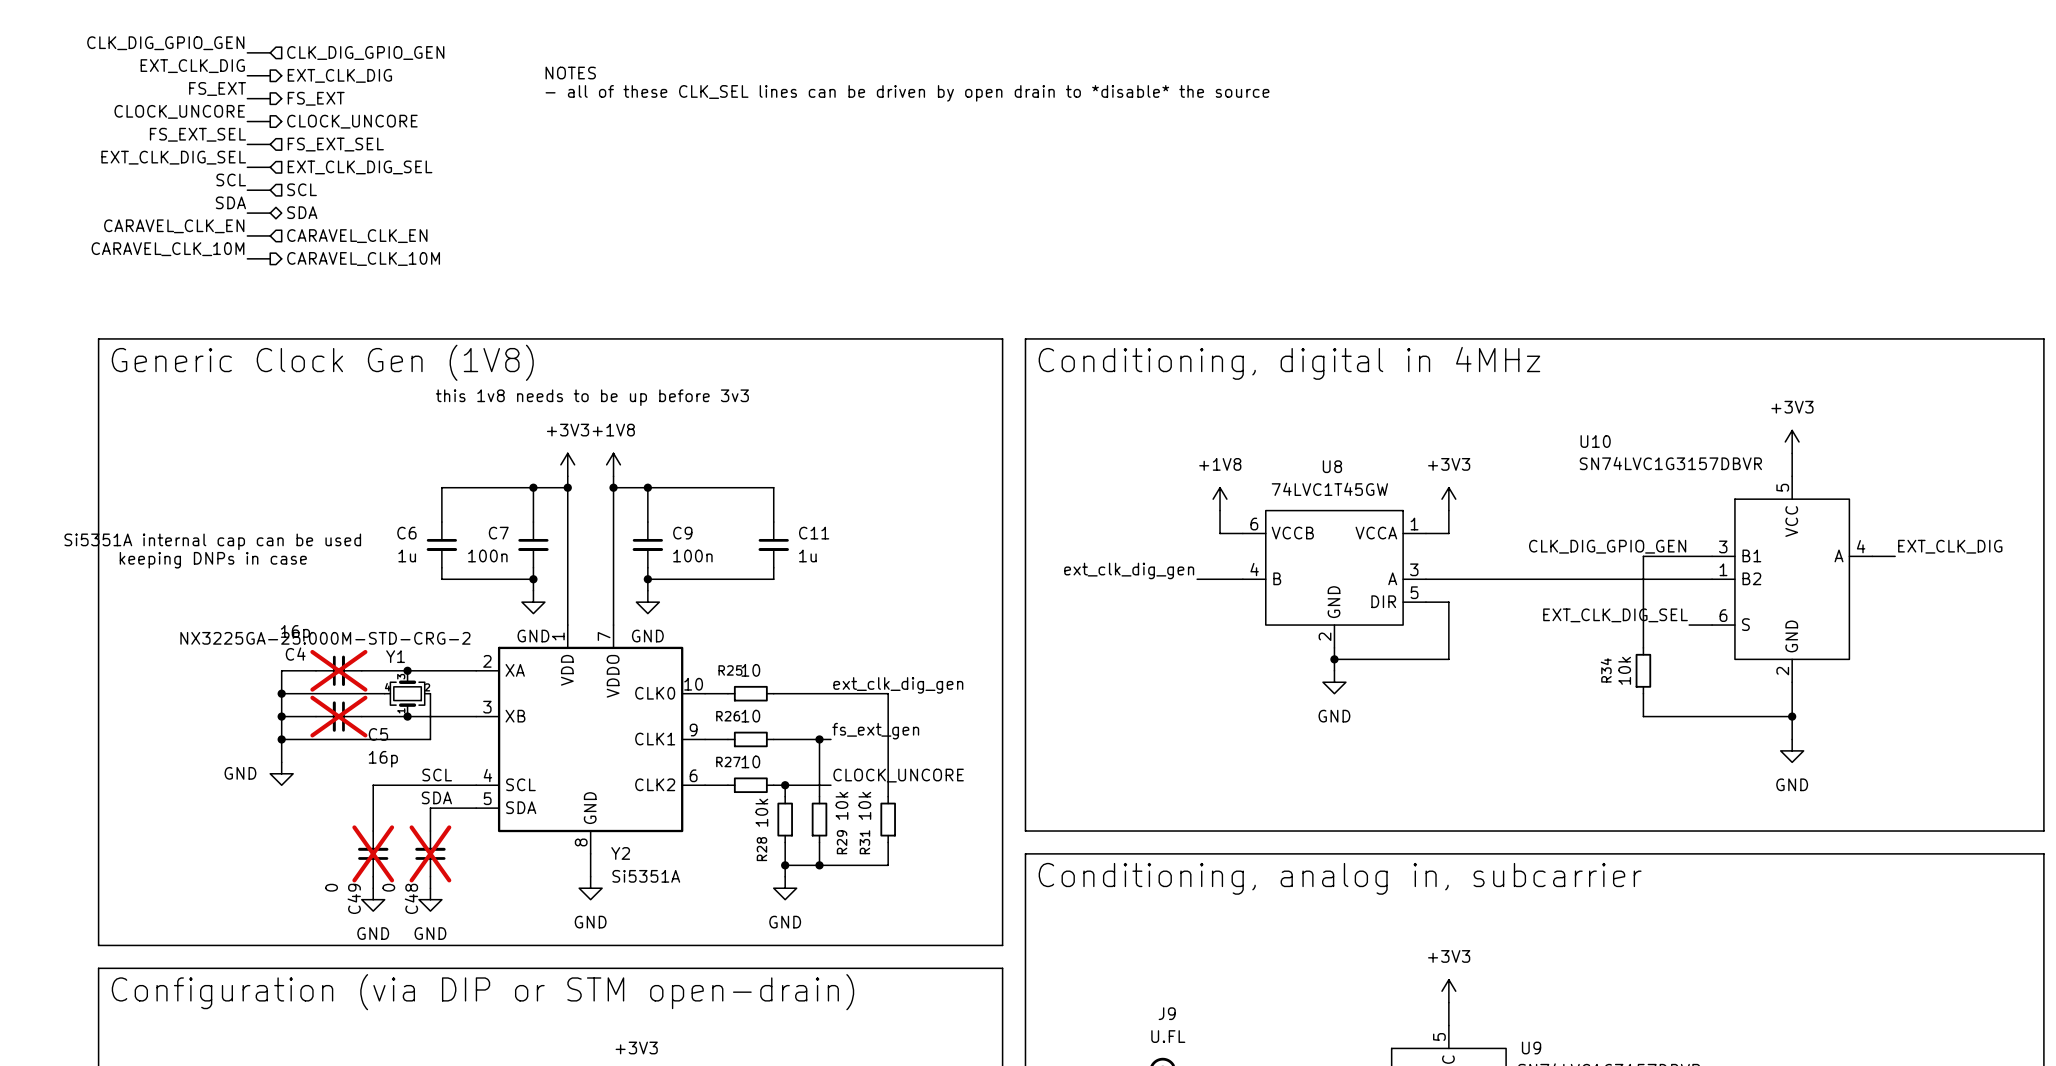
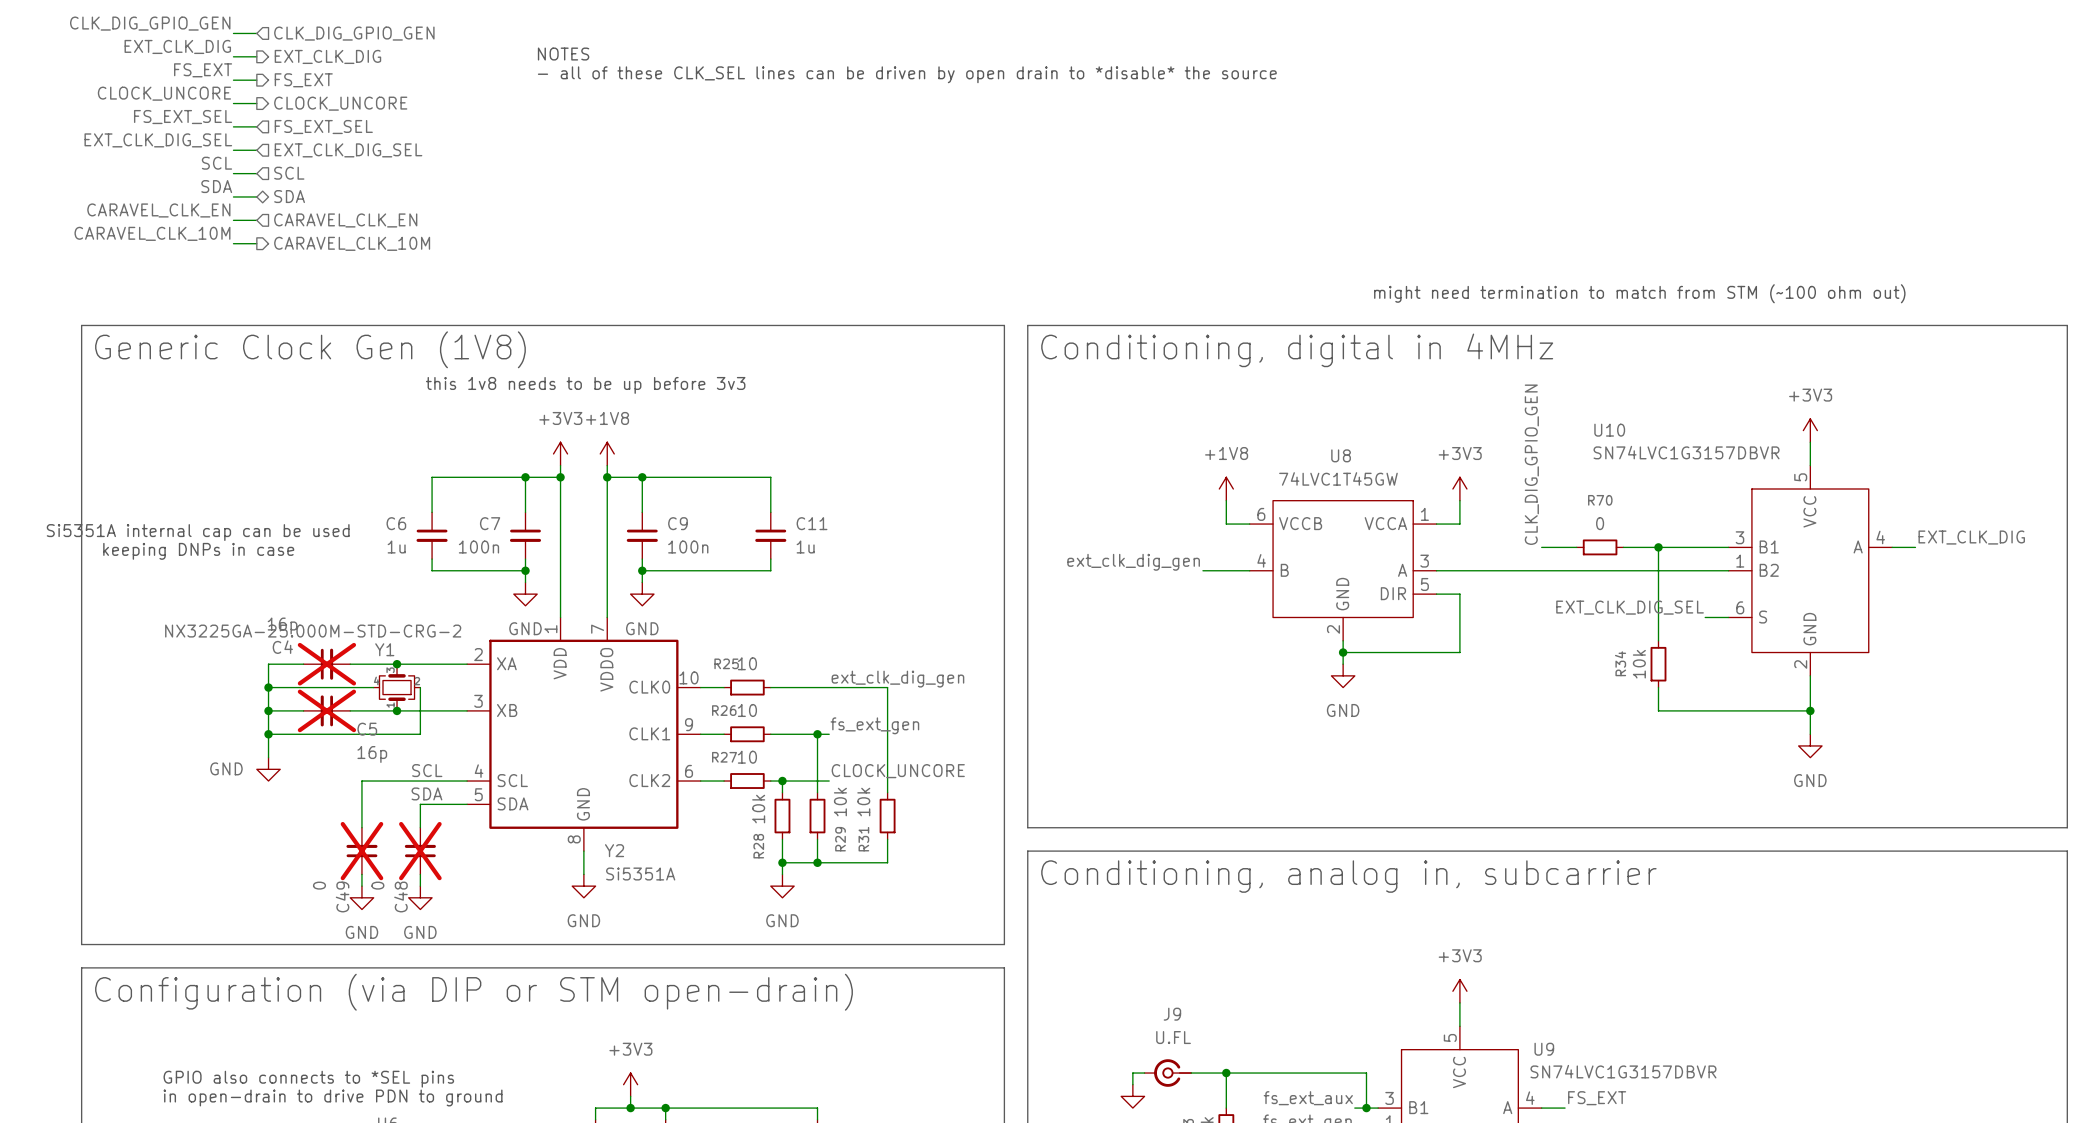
text: none -> might need termination to match from STM (~100 ohm out) (1639, 293)
label rotation: 0° (1607, 546) -> 90° counterclockwise (1531, 464)
wire: none -> (1541, 547) (1576, 547)
R70: none -> 0 (1600, 547)
wire: none -> (1623, 547) (1658, 547)
junction: none -> (1658, 547)

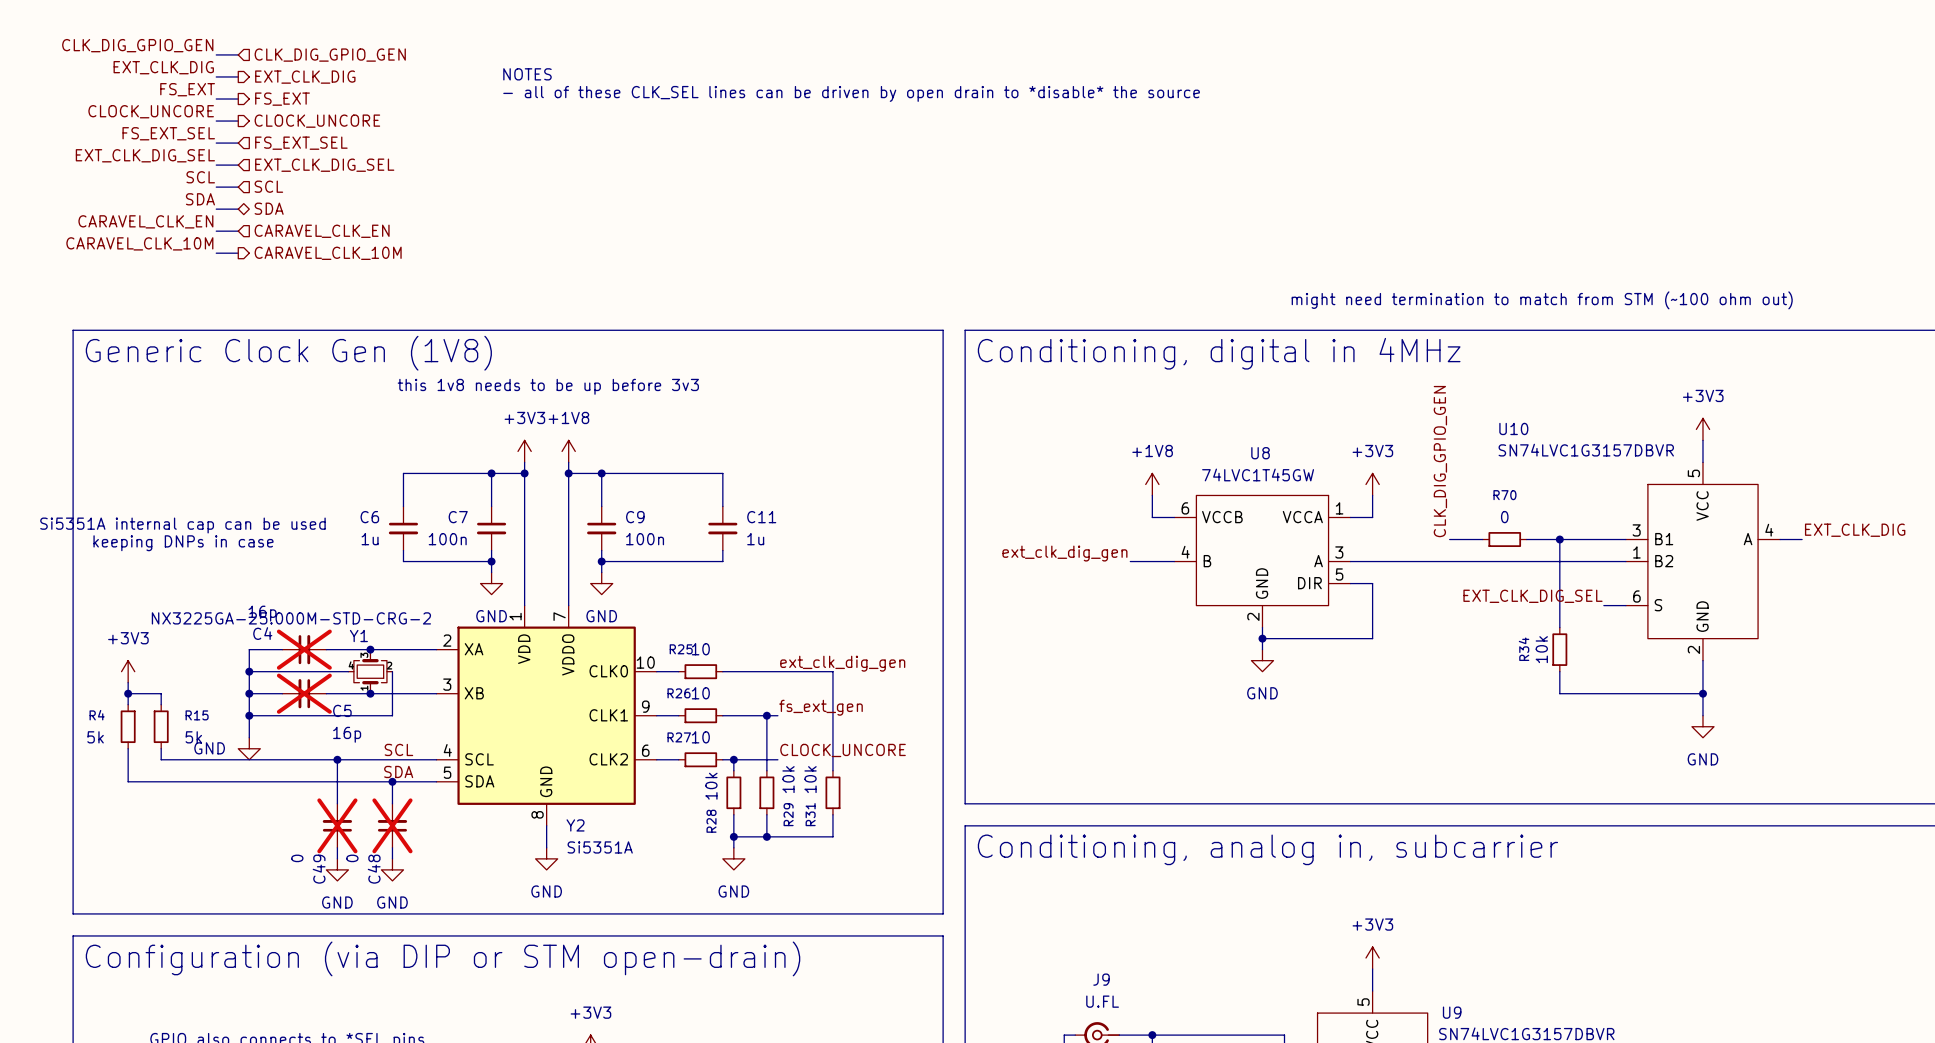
power symbol: none -> +3V3 (128, 671)
wire: none -> (128, 682) (128, 704)
wire: none -> (128, 693) (161, 693) (161, 704)
junction: none -> (128, 693)
R4: none -> 5k (128, 726)
R15: none -> 5k (161, 726)
wire: none -> (128, 748) (128, 781) (392, 781)
wire: none -> (161, 748) (161, 759) (337, 759)
junction: none -> (337, 759)
junction: none -> (392, 781)

